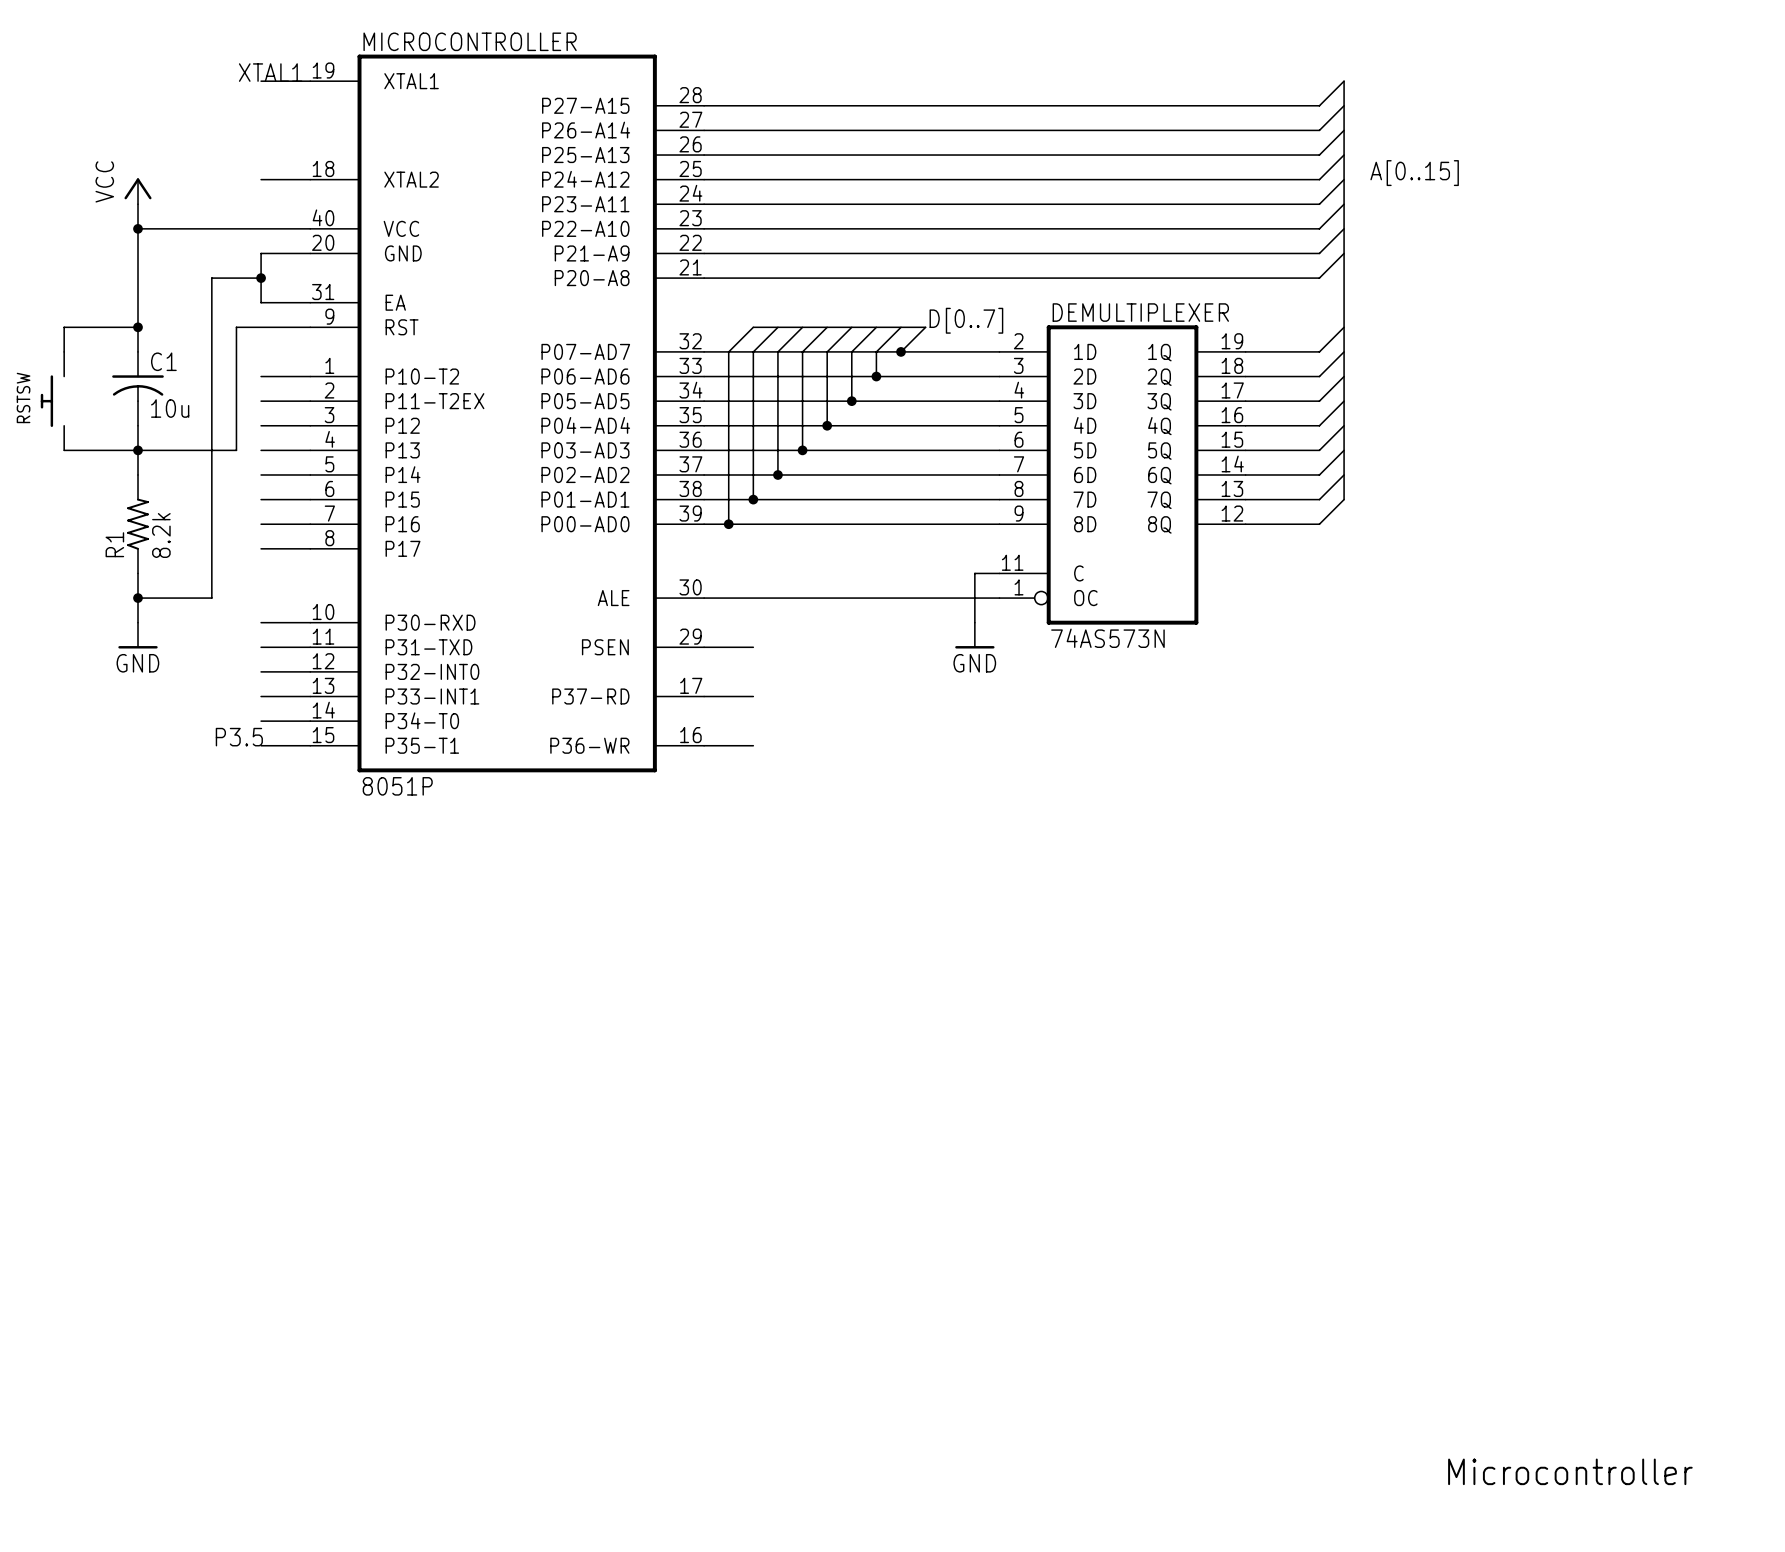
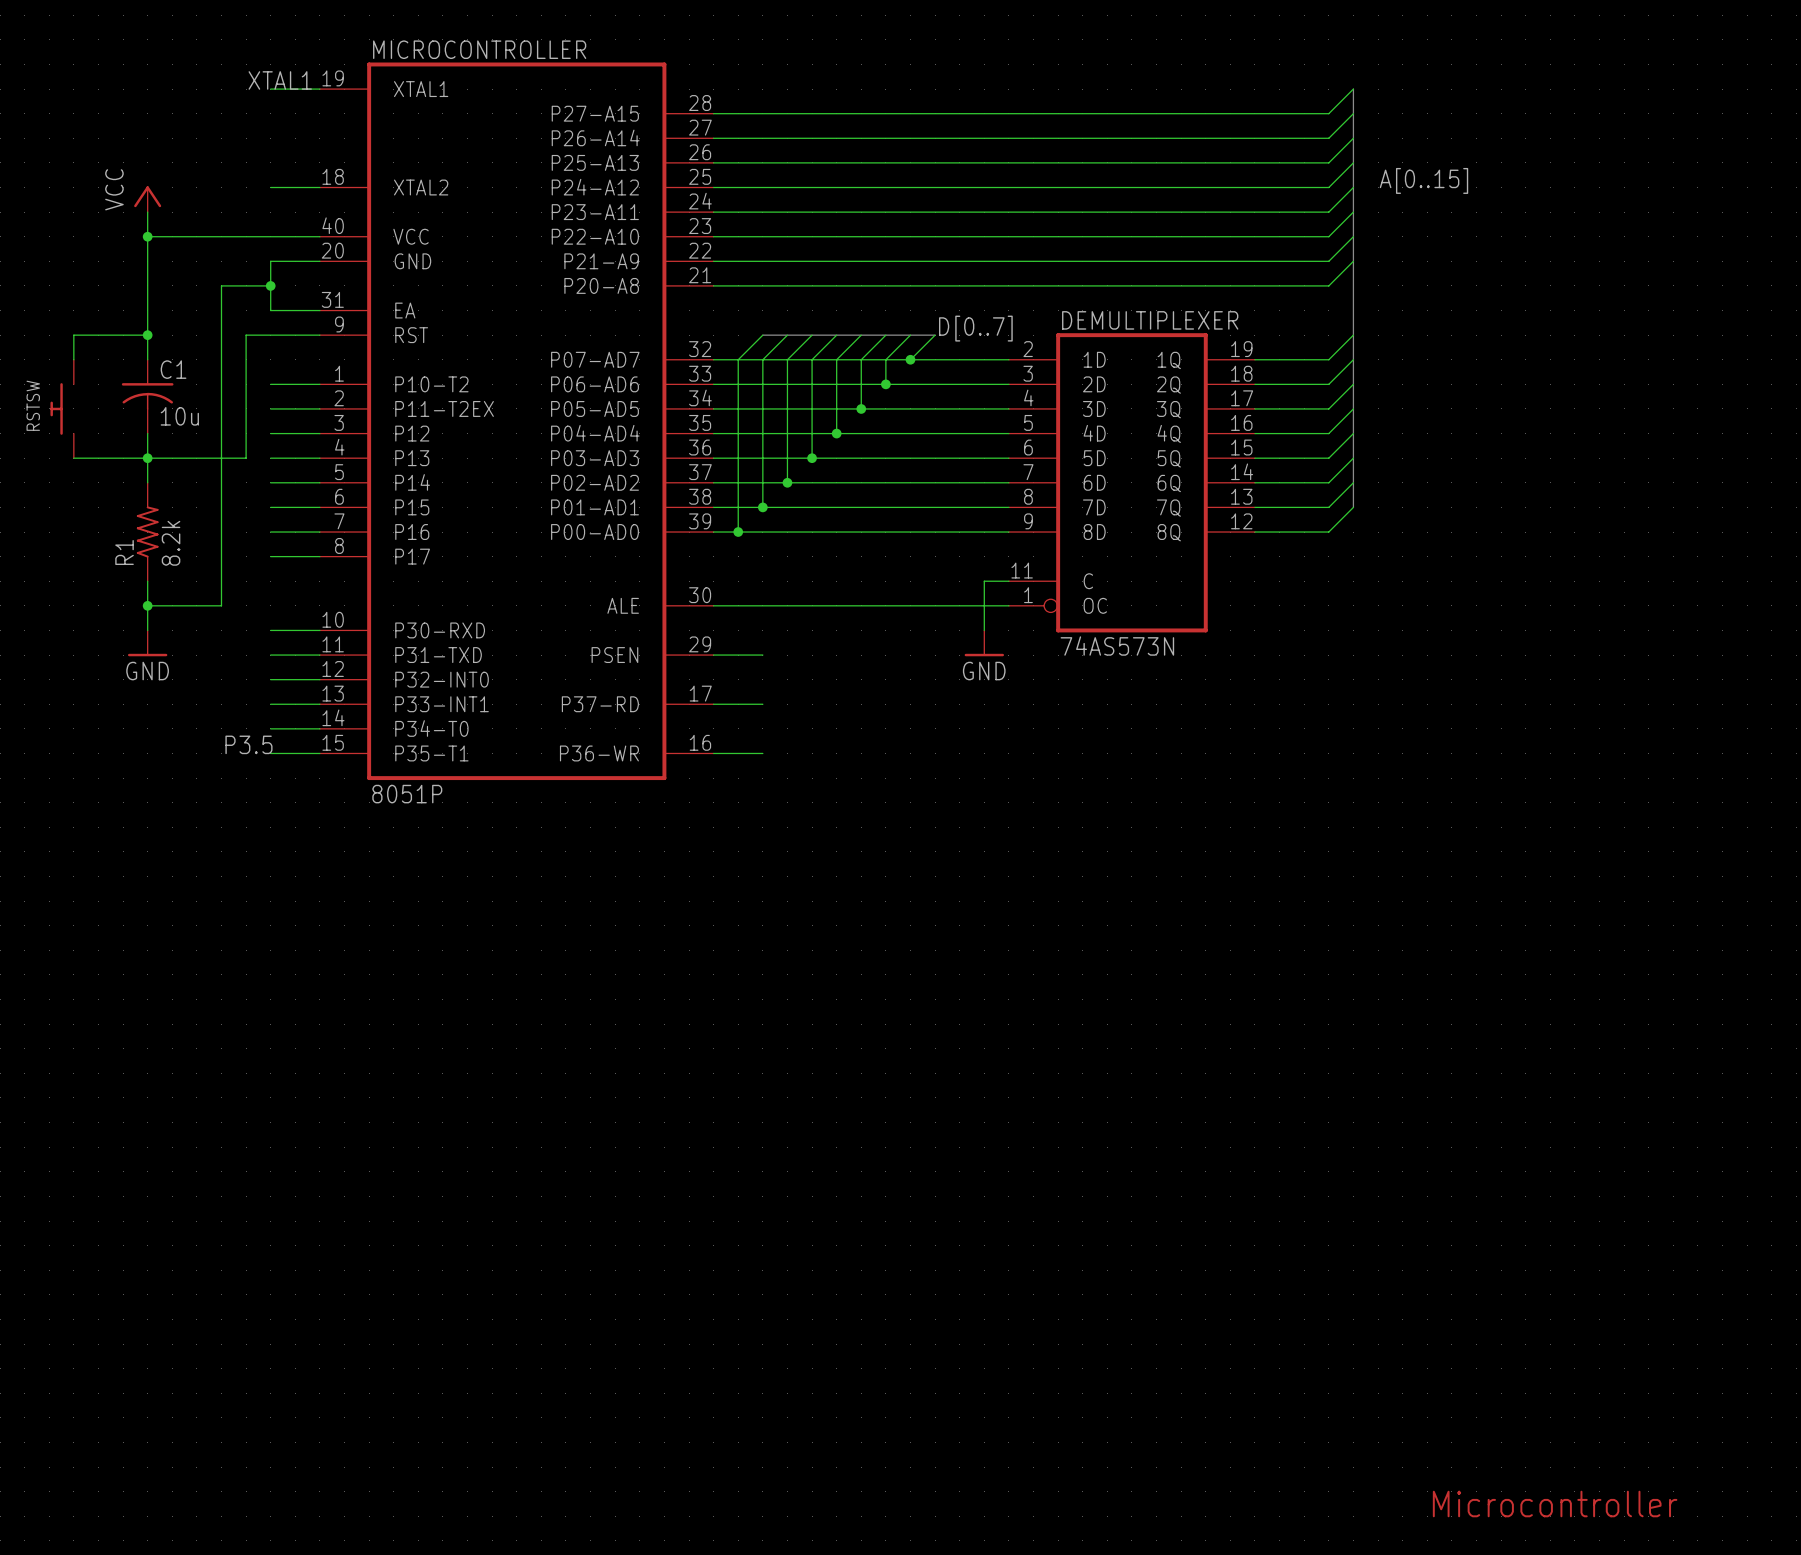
text position: Microcontroller (1570, 1471) -> Microcontroller (1555, 1504)

